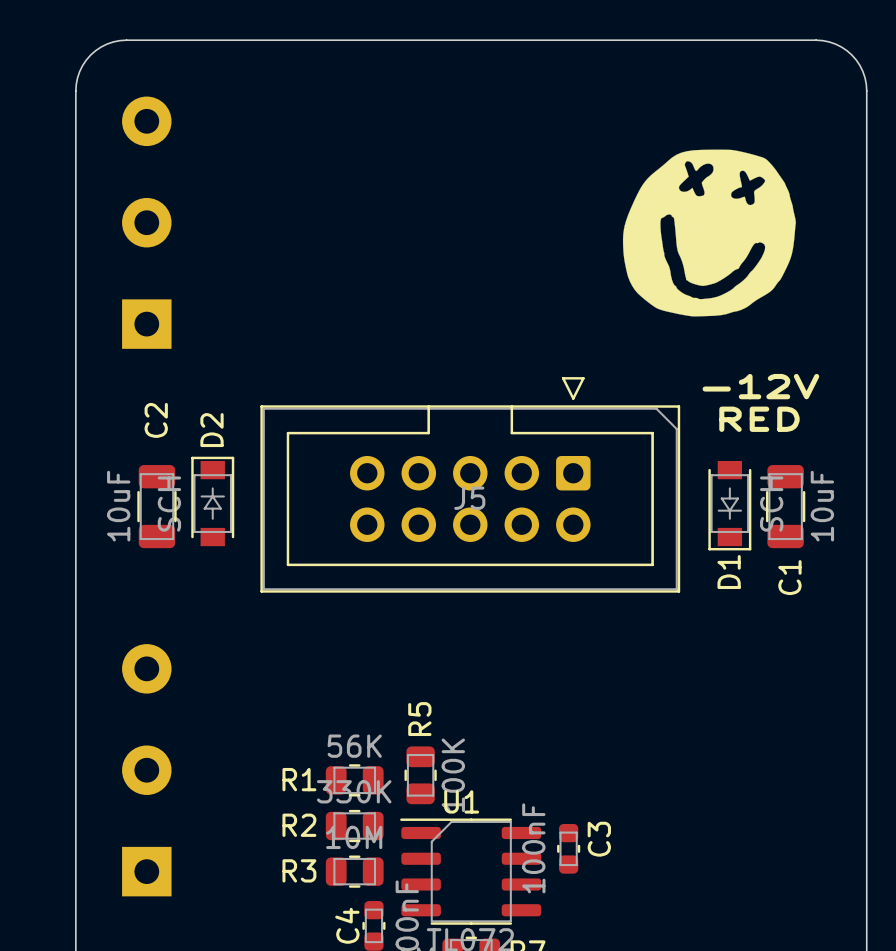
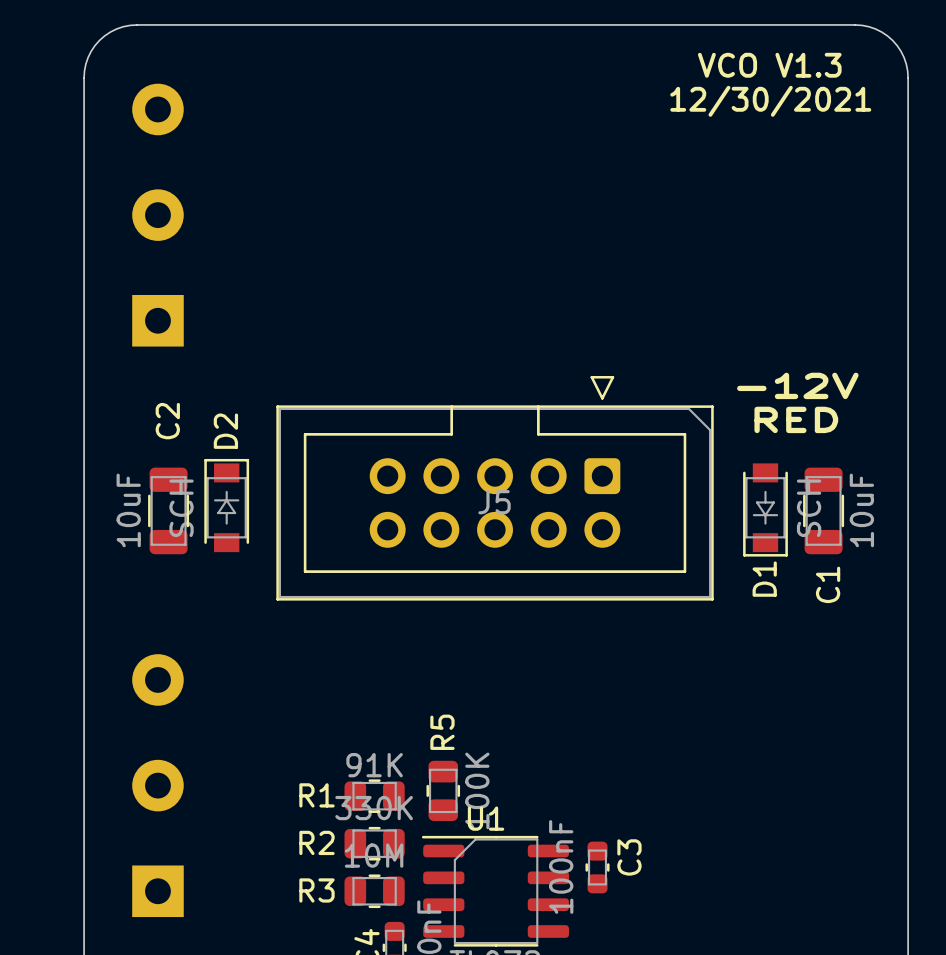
text: none -> VCO V1.3 (769, 65)
text: none -> 12/30/2021 (770, 101)
drawing: [622, 149, 796, 317] -> none
R1 value: 56K (354, 746) -> 91K (374, 765)

